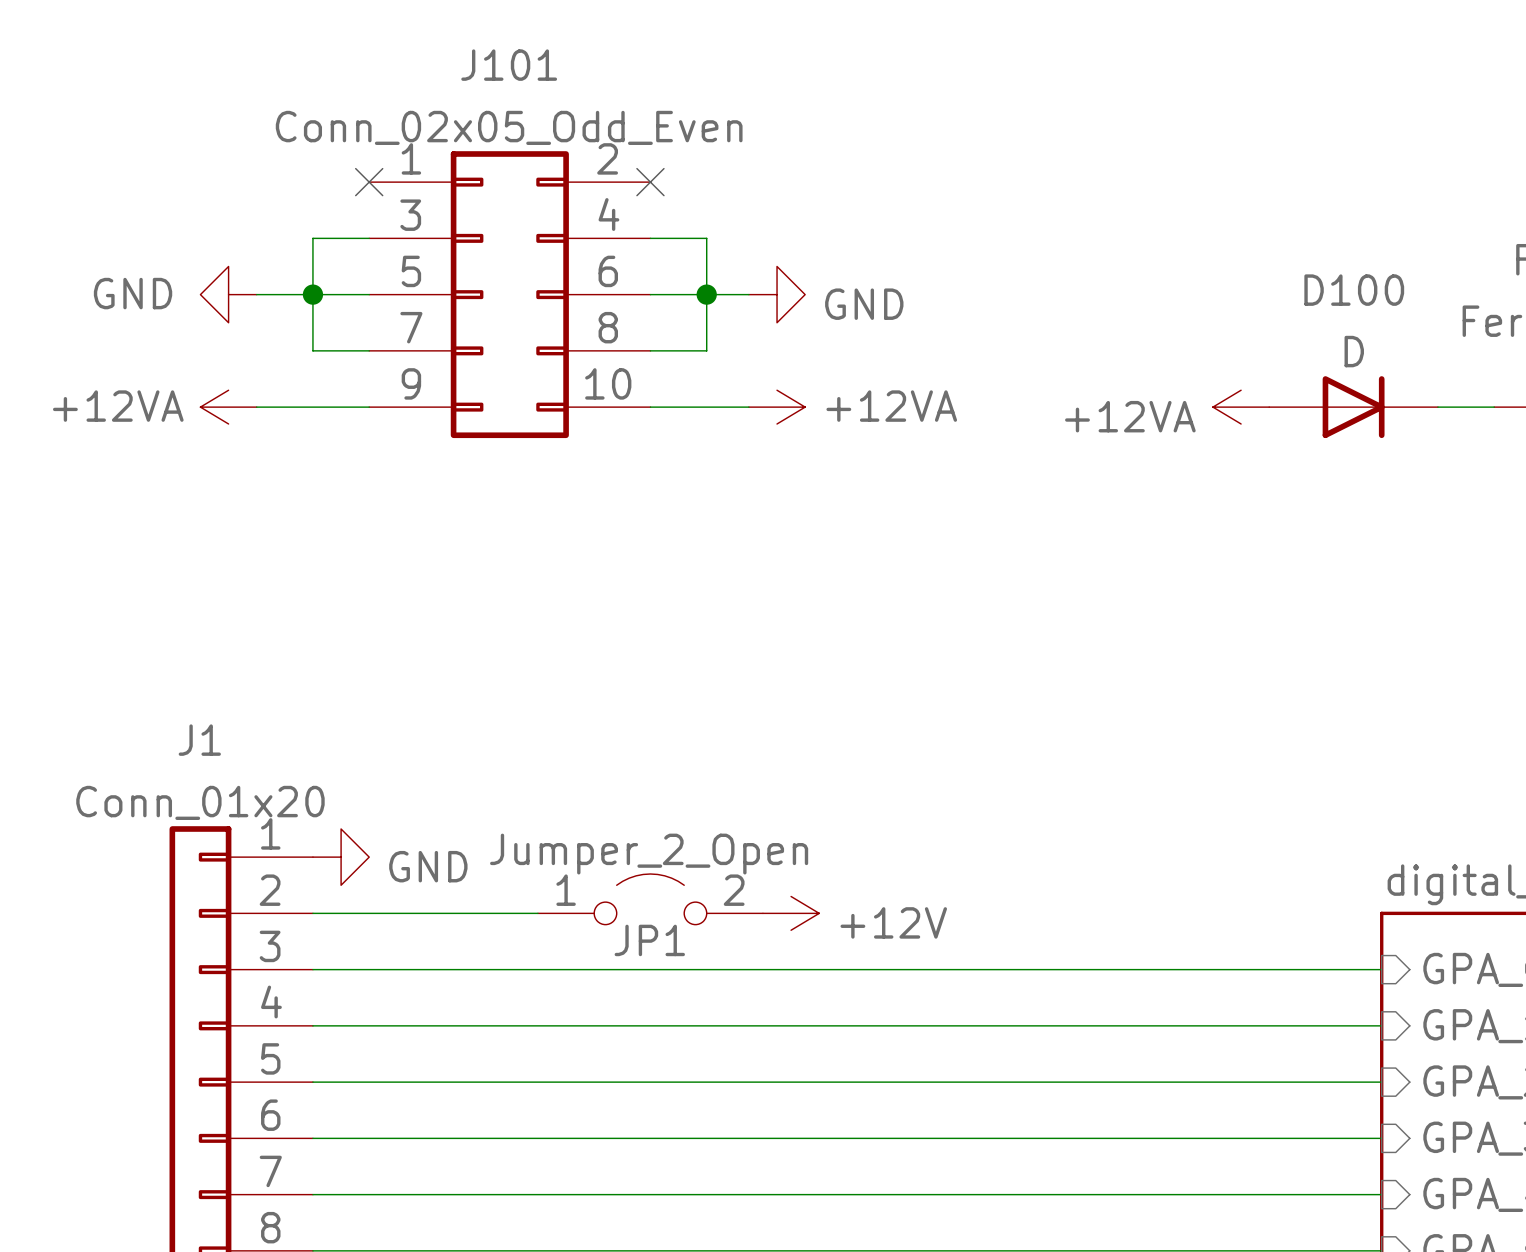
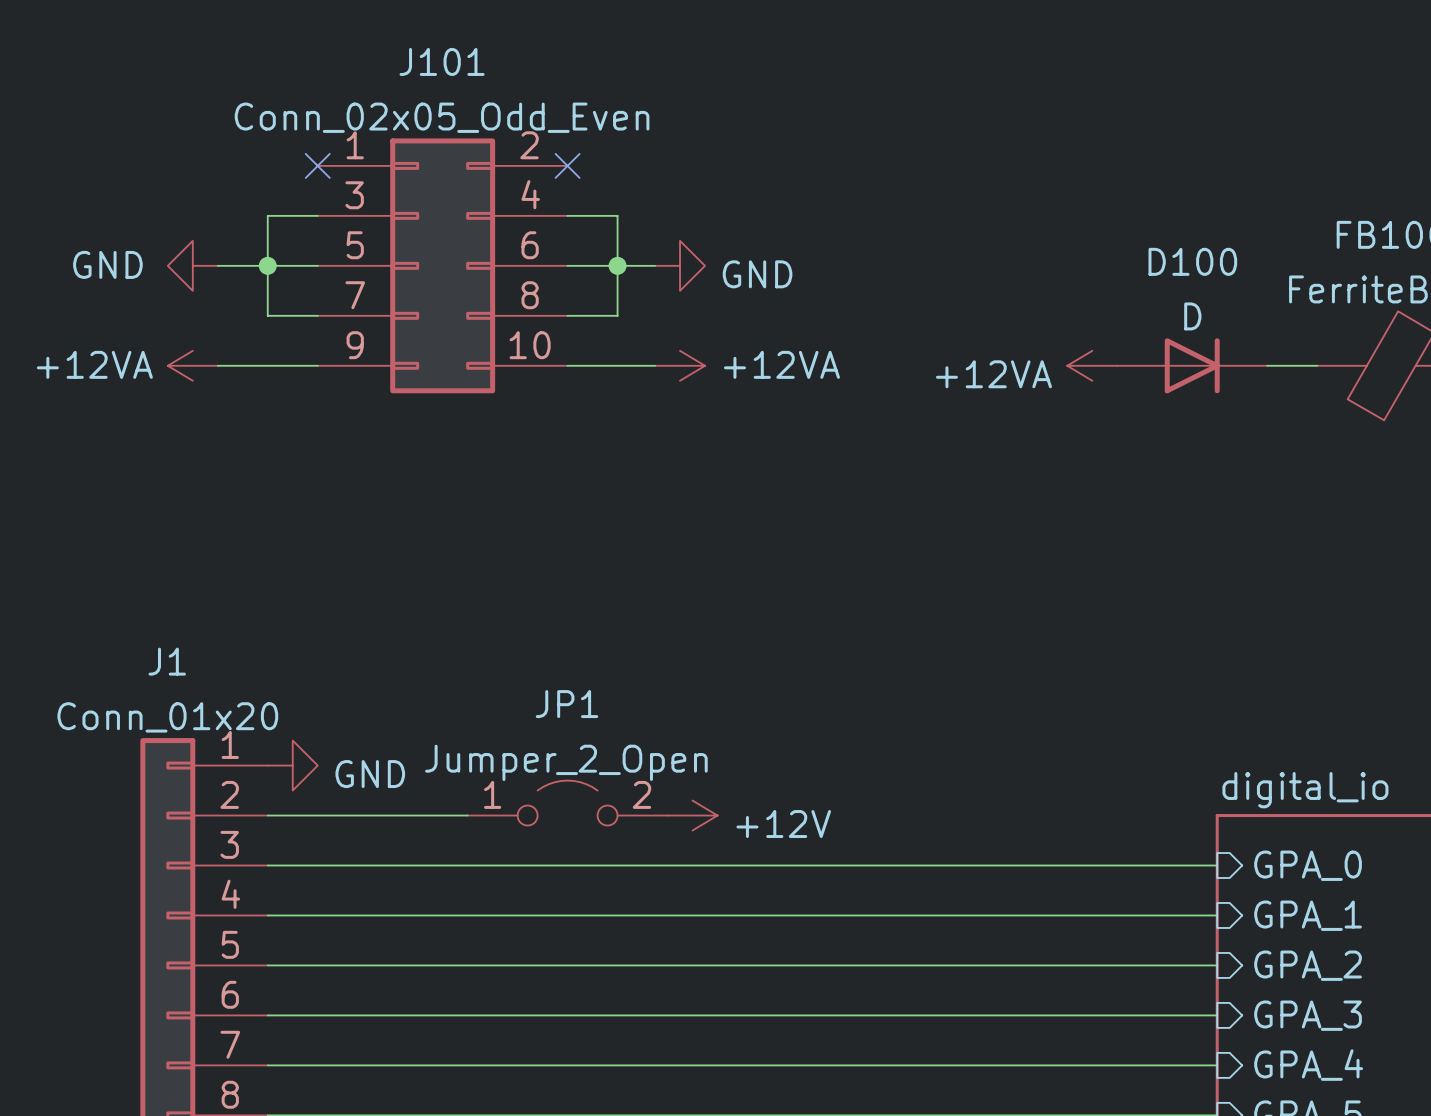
JP1 name position: JP1 (649, 940) -> JP1 (566, 704)

